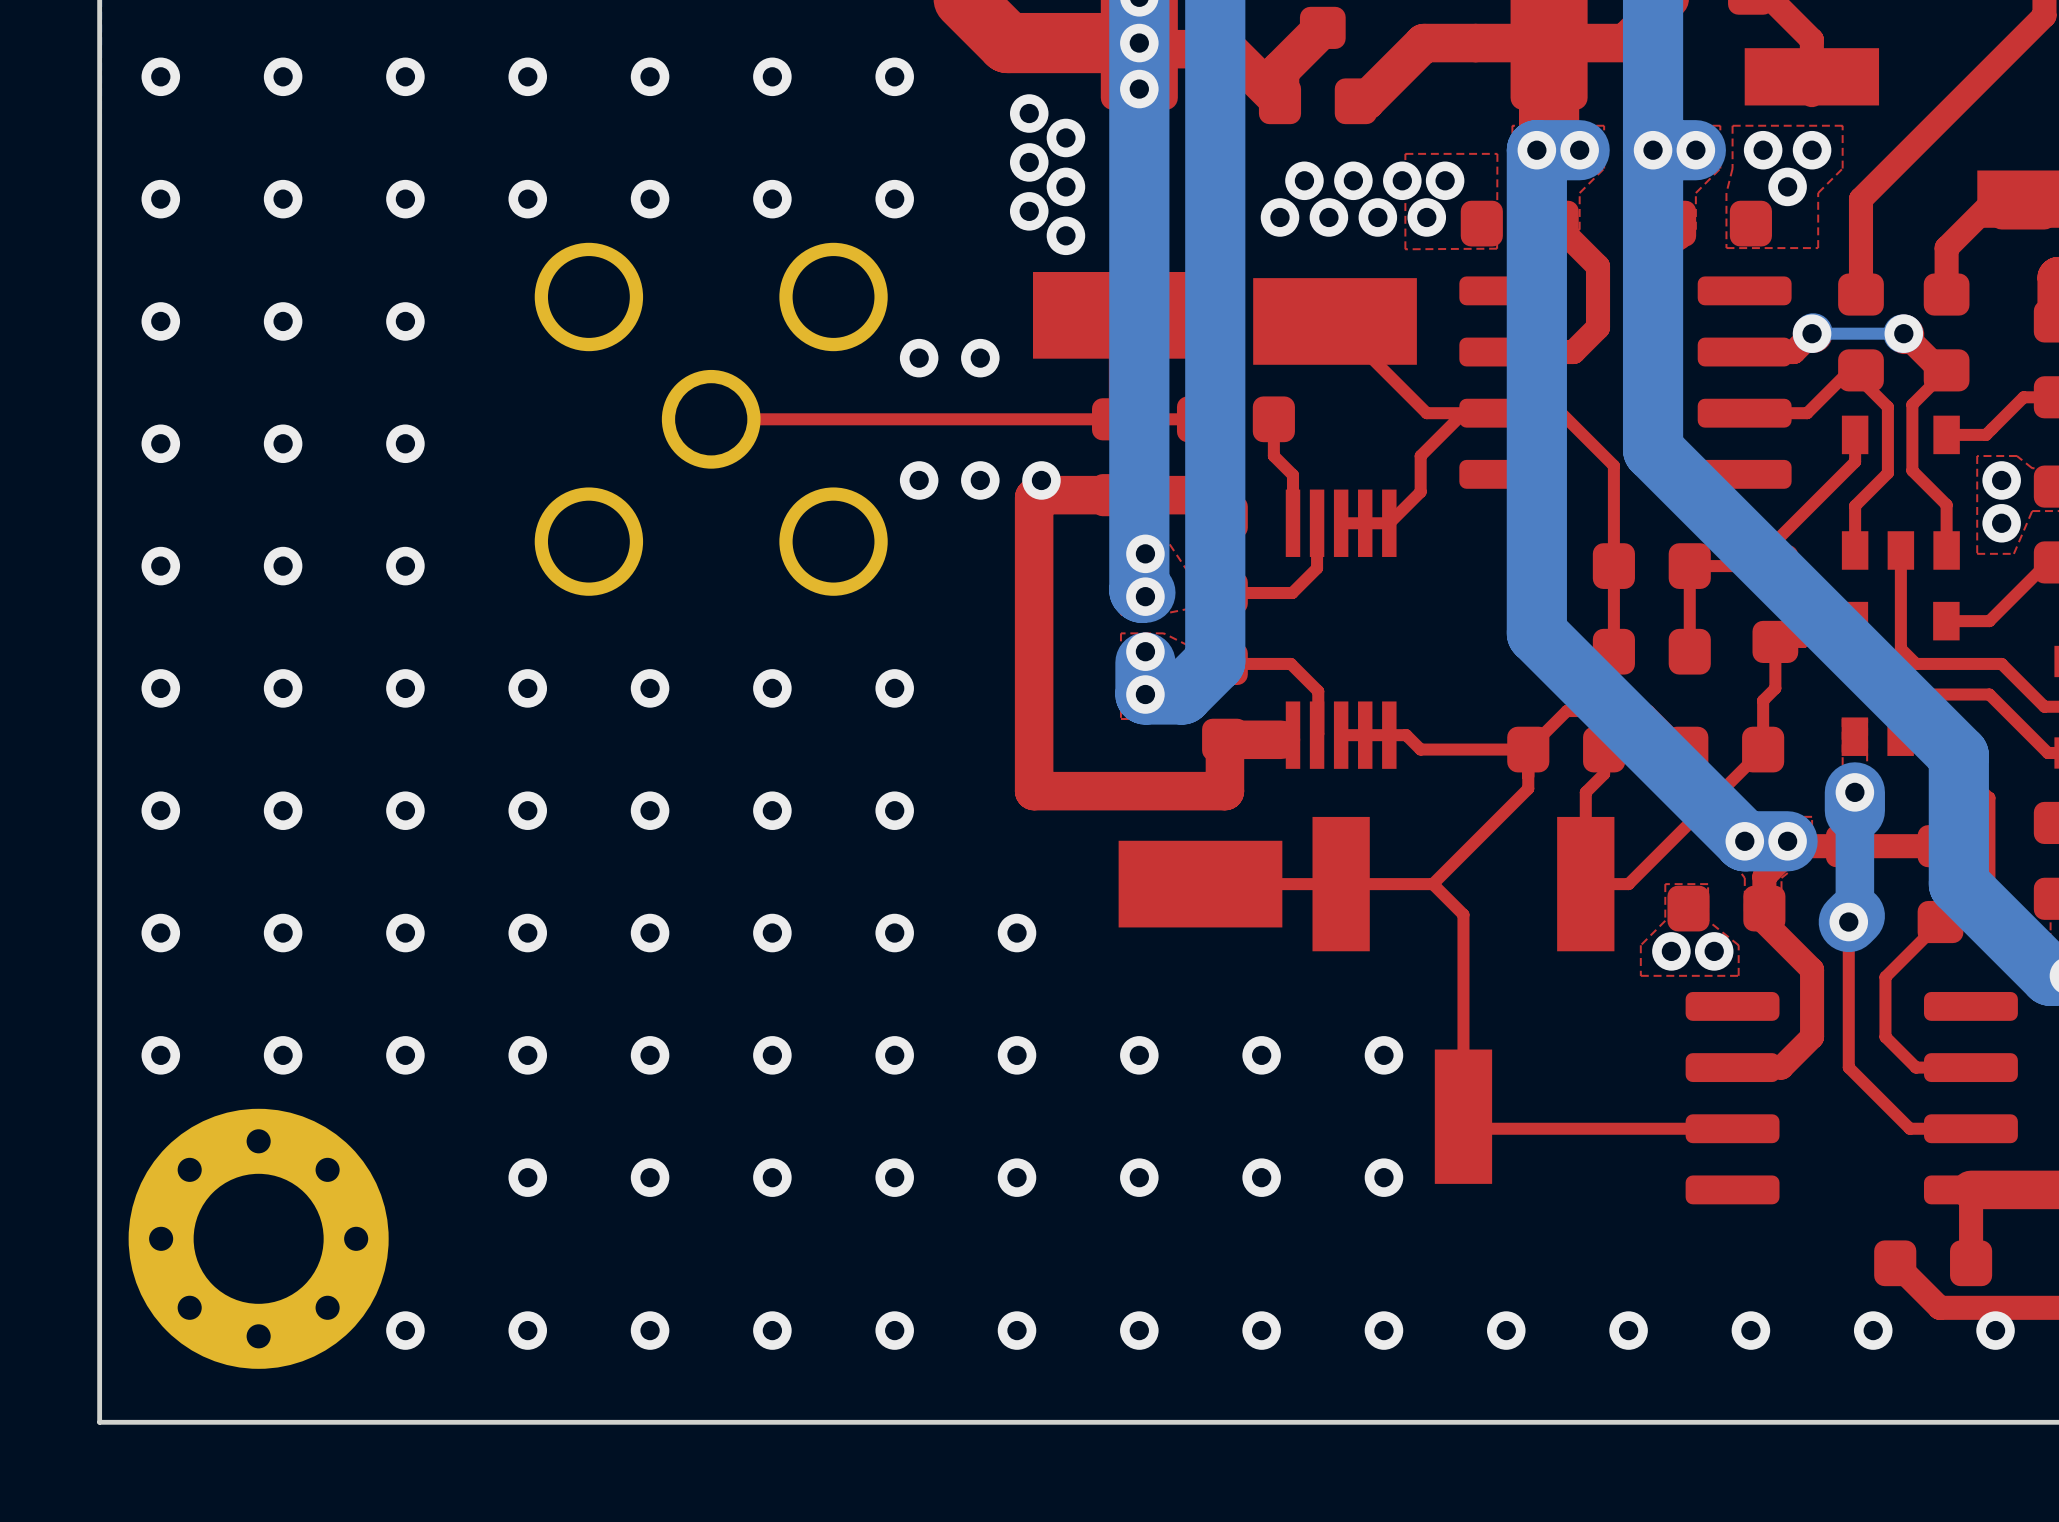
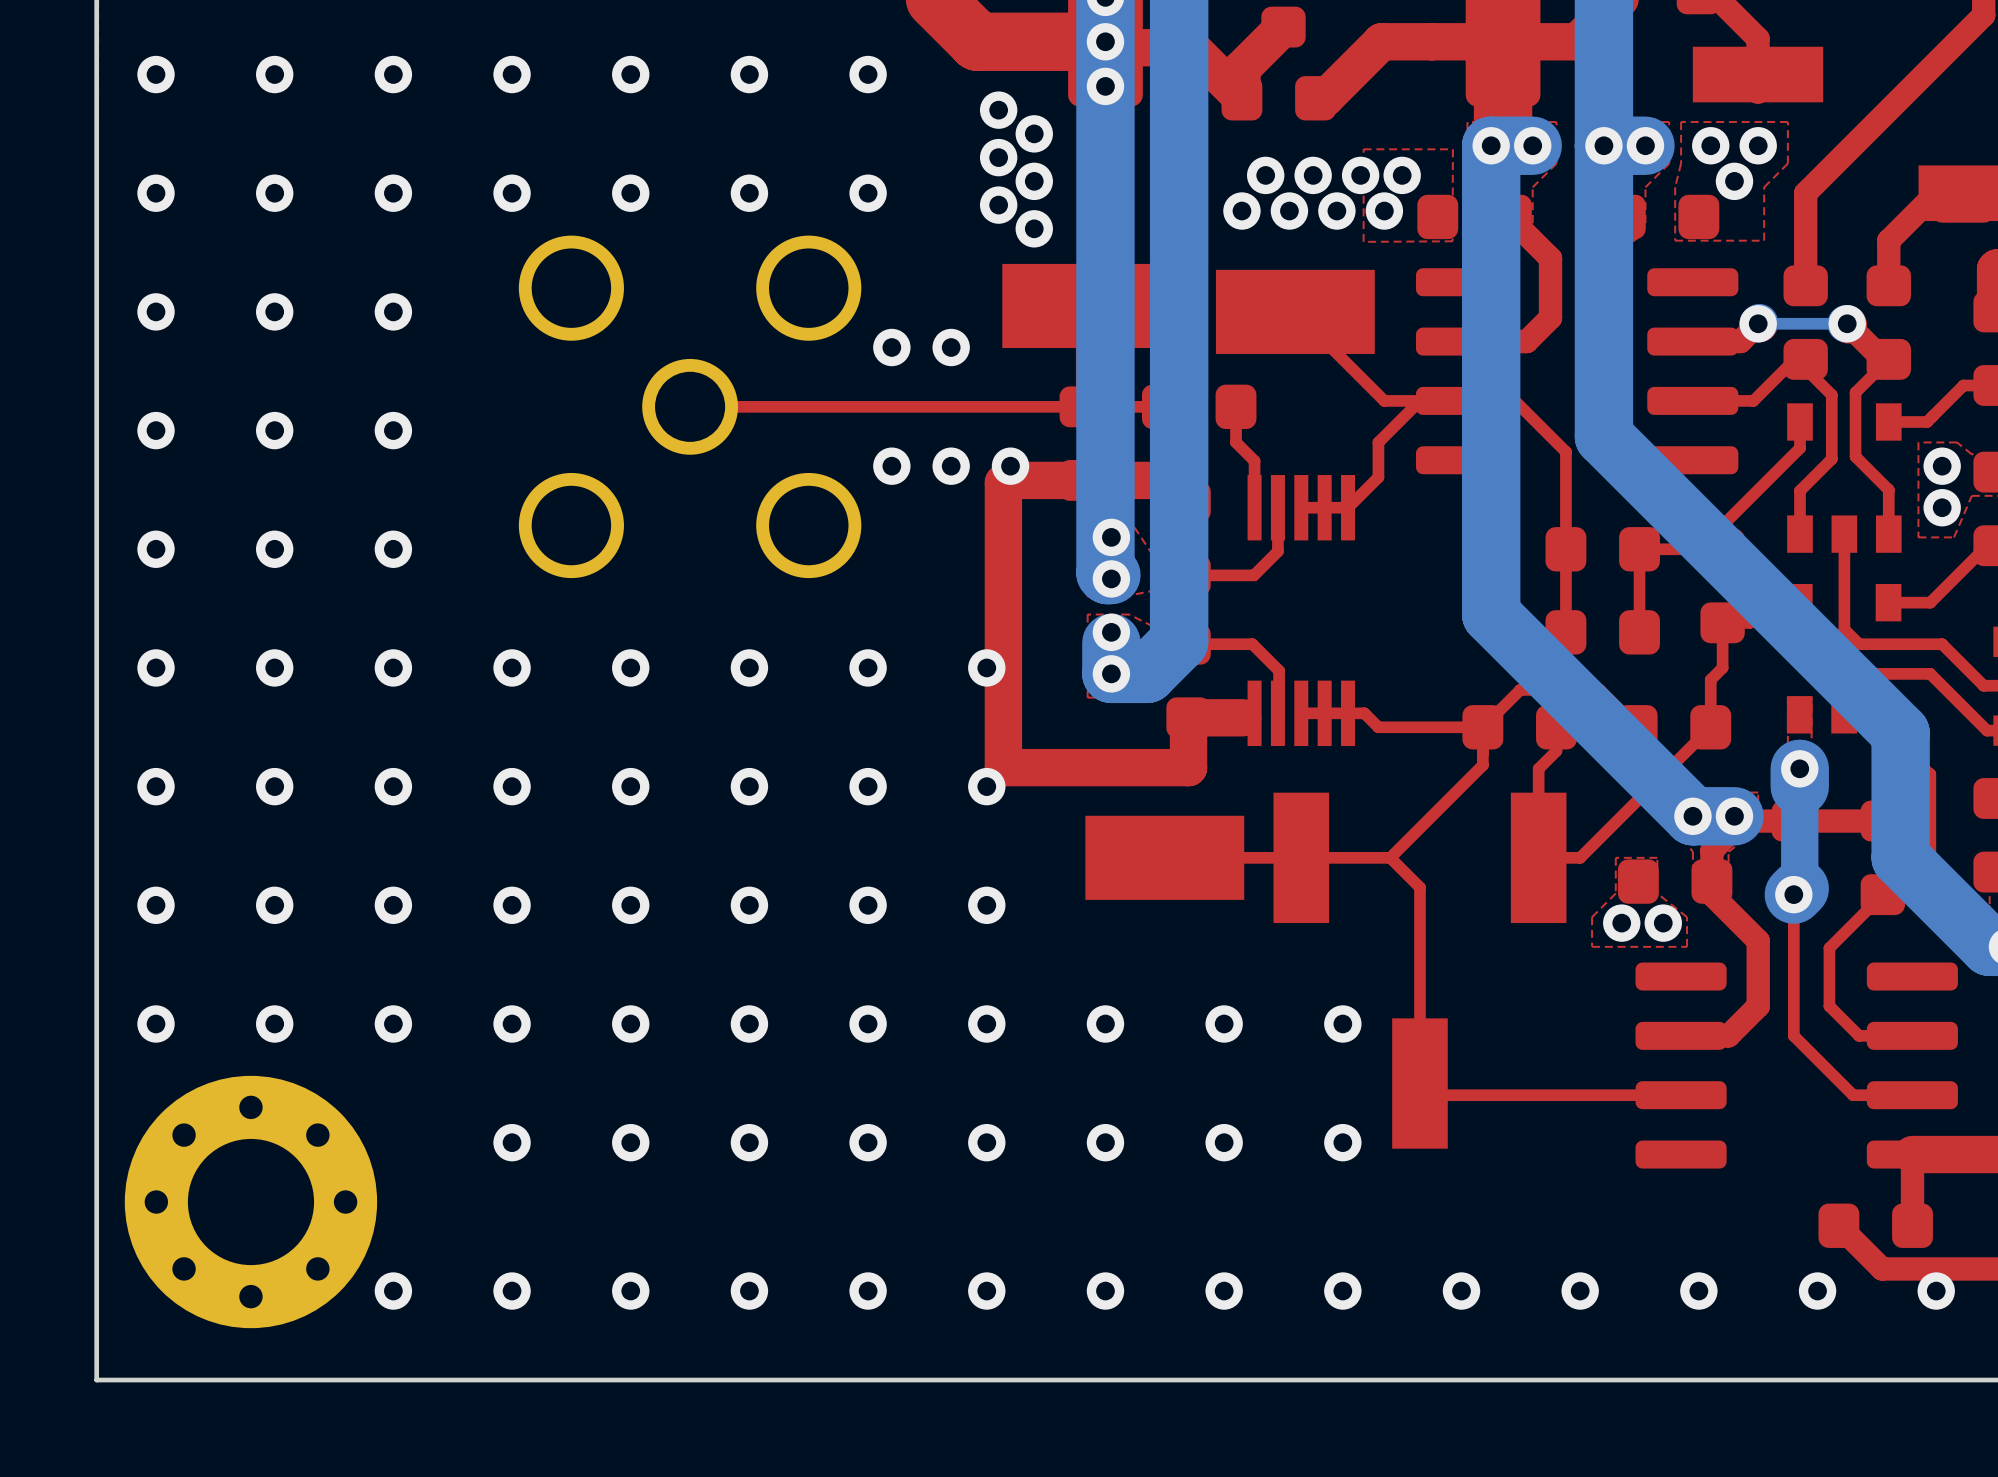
via: none -> (986, 667)
via: none -> (986, 786)

